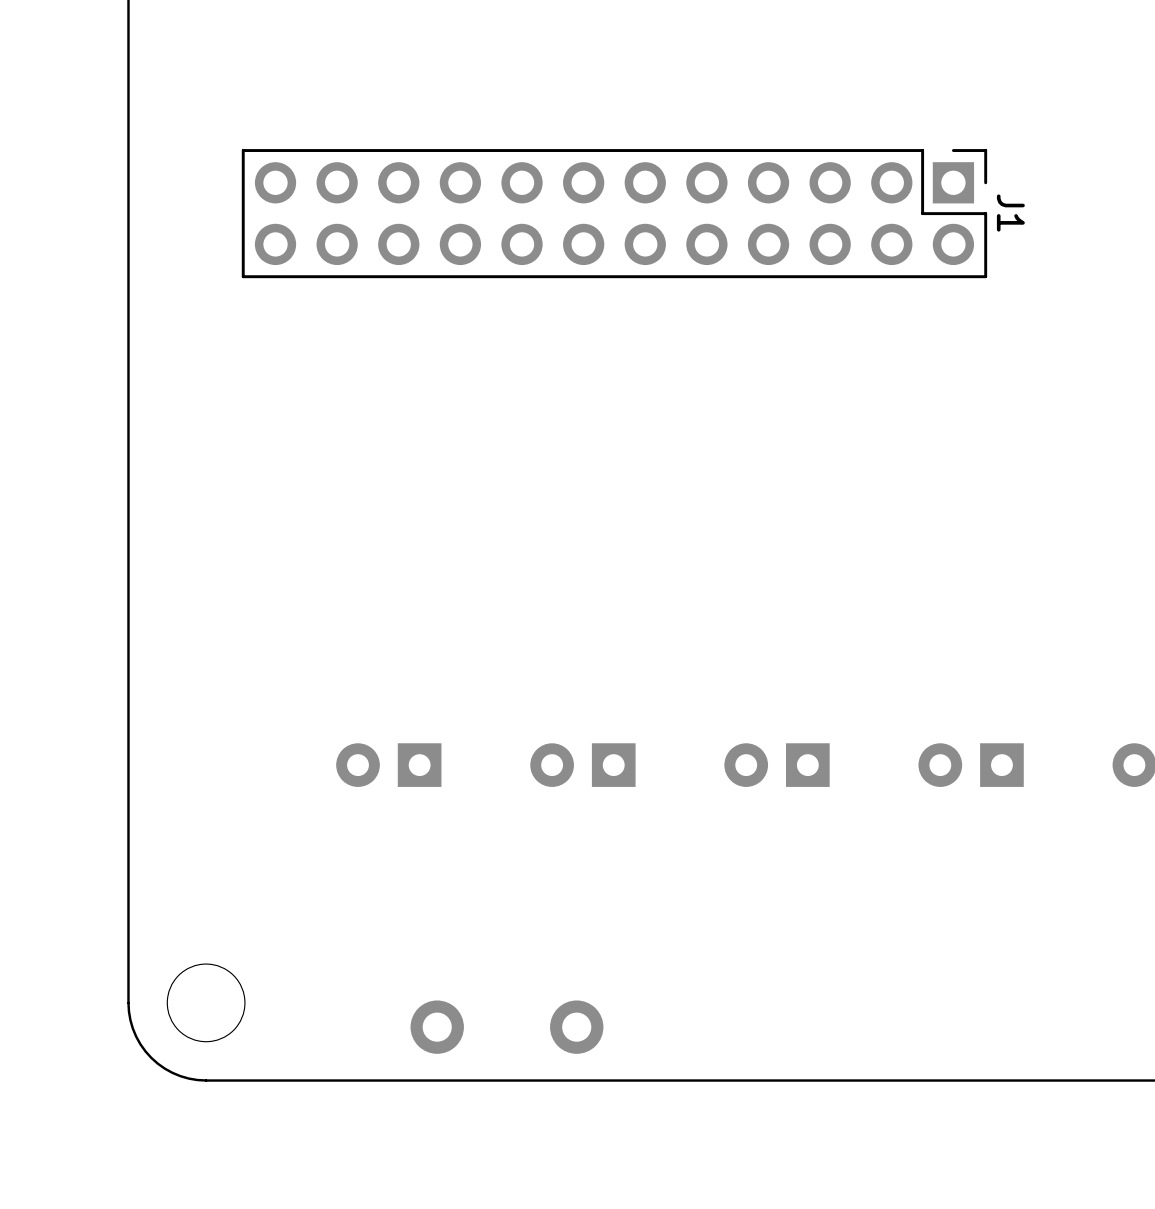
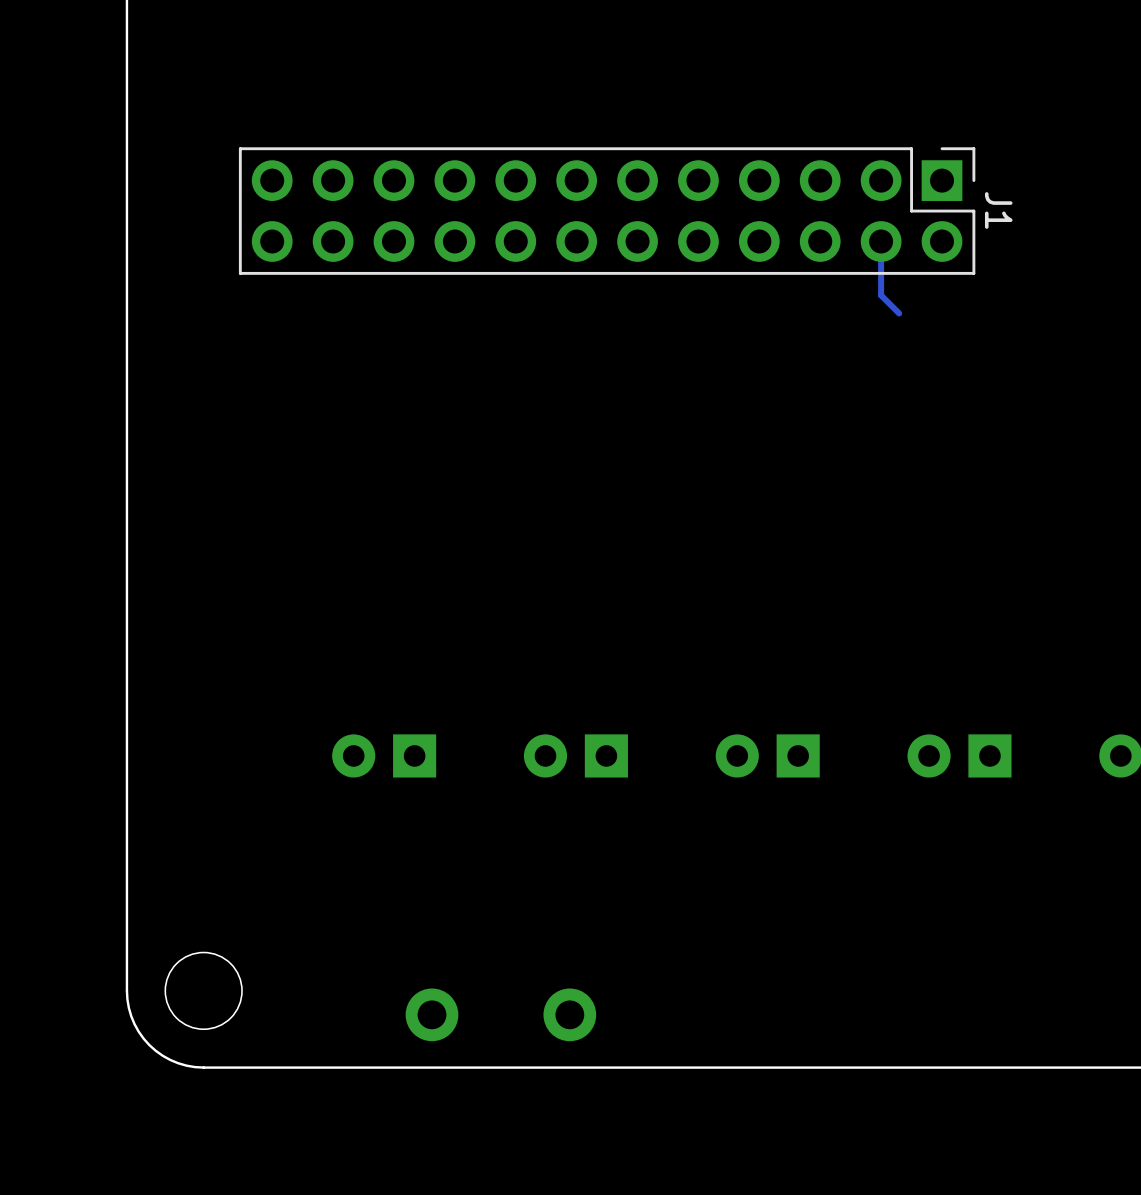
track: none -> (881, 241) (881, 295) (899, 313)

